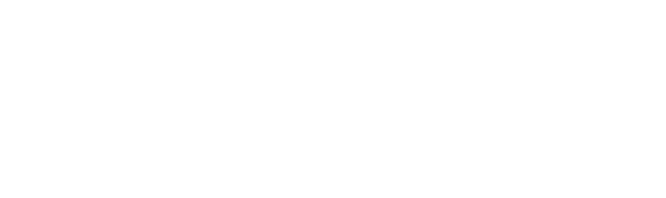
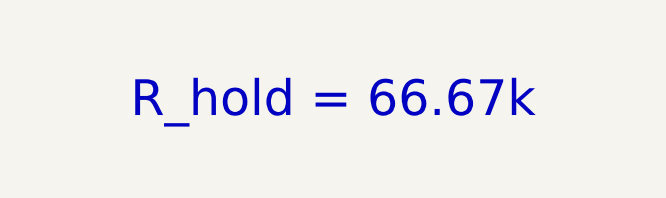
text: none -> R_hold = 66.67k (335, 102)

